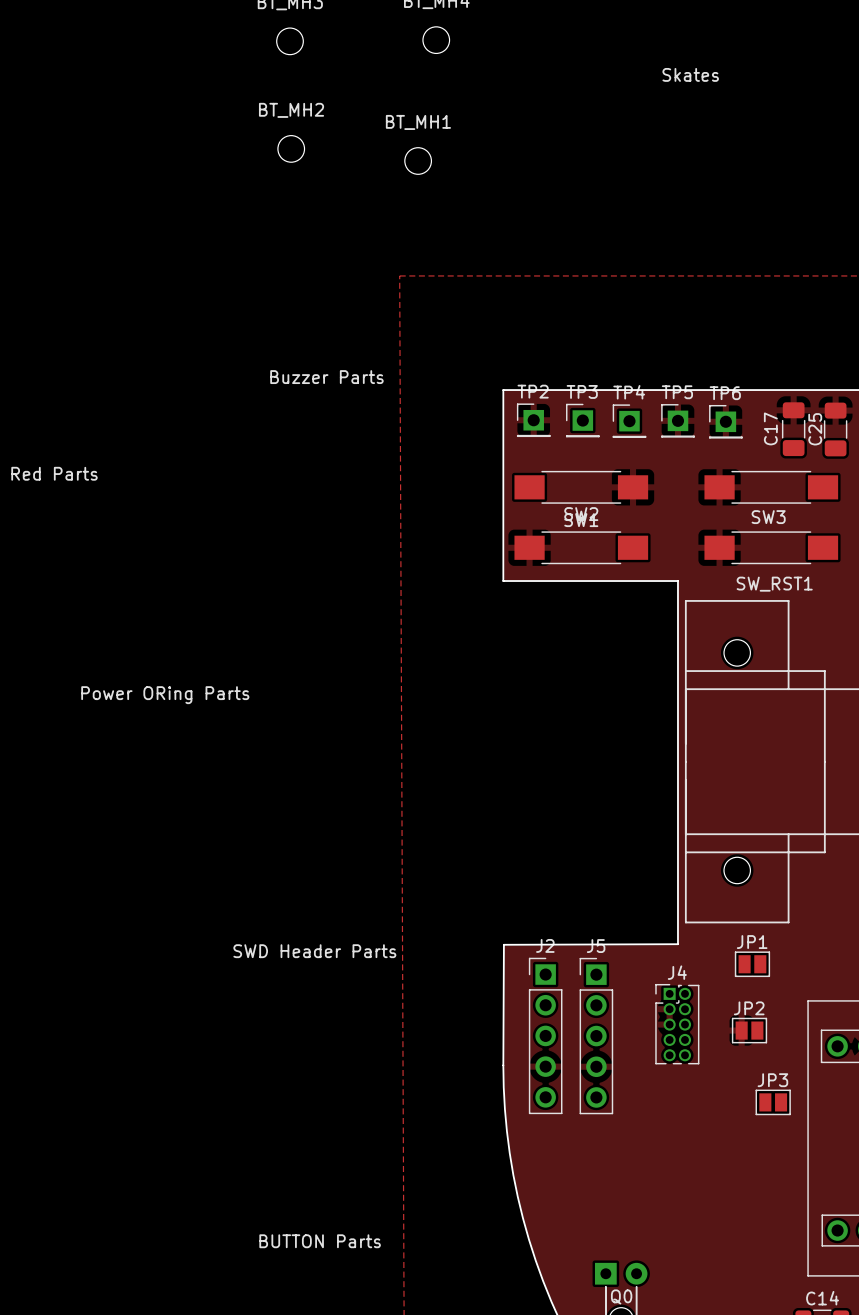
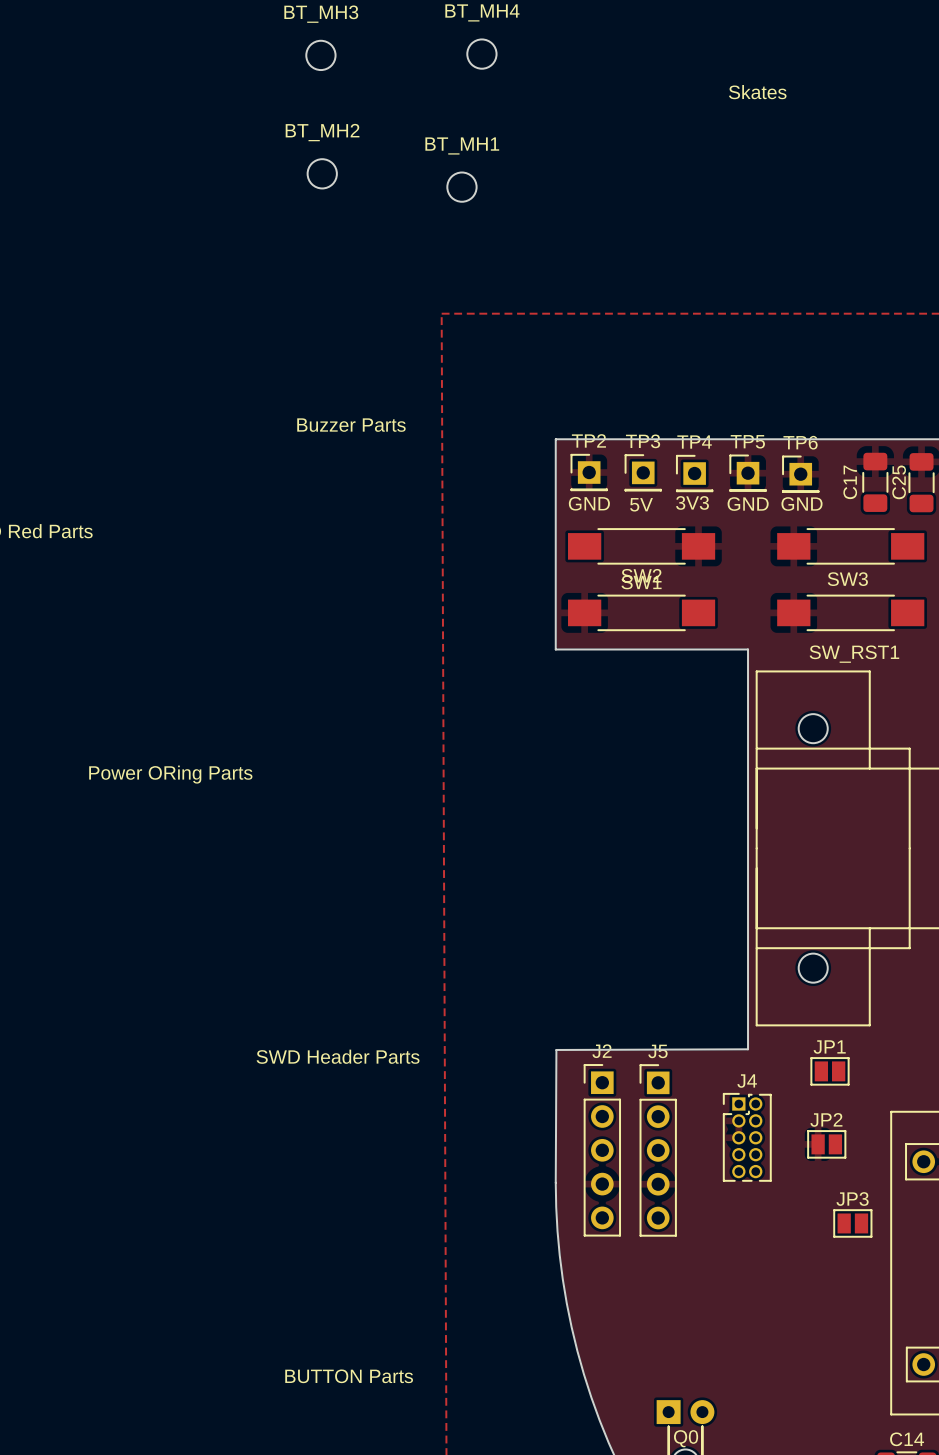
text: none -> 3V3 (692, 502)
text: none -> GND (589, 503)
text: none -> GND (748, 504)
text: none -> GND (802, 504)
text: none -> 5V (641, 504)

